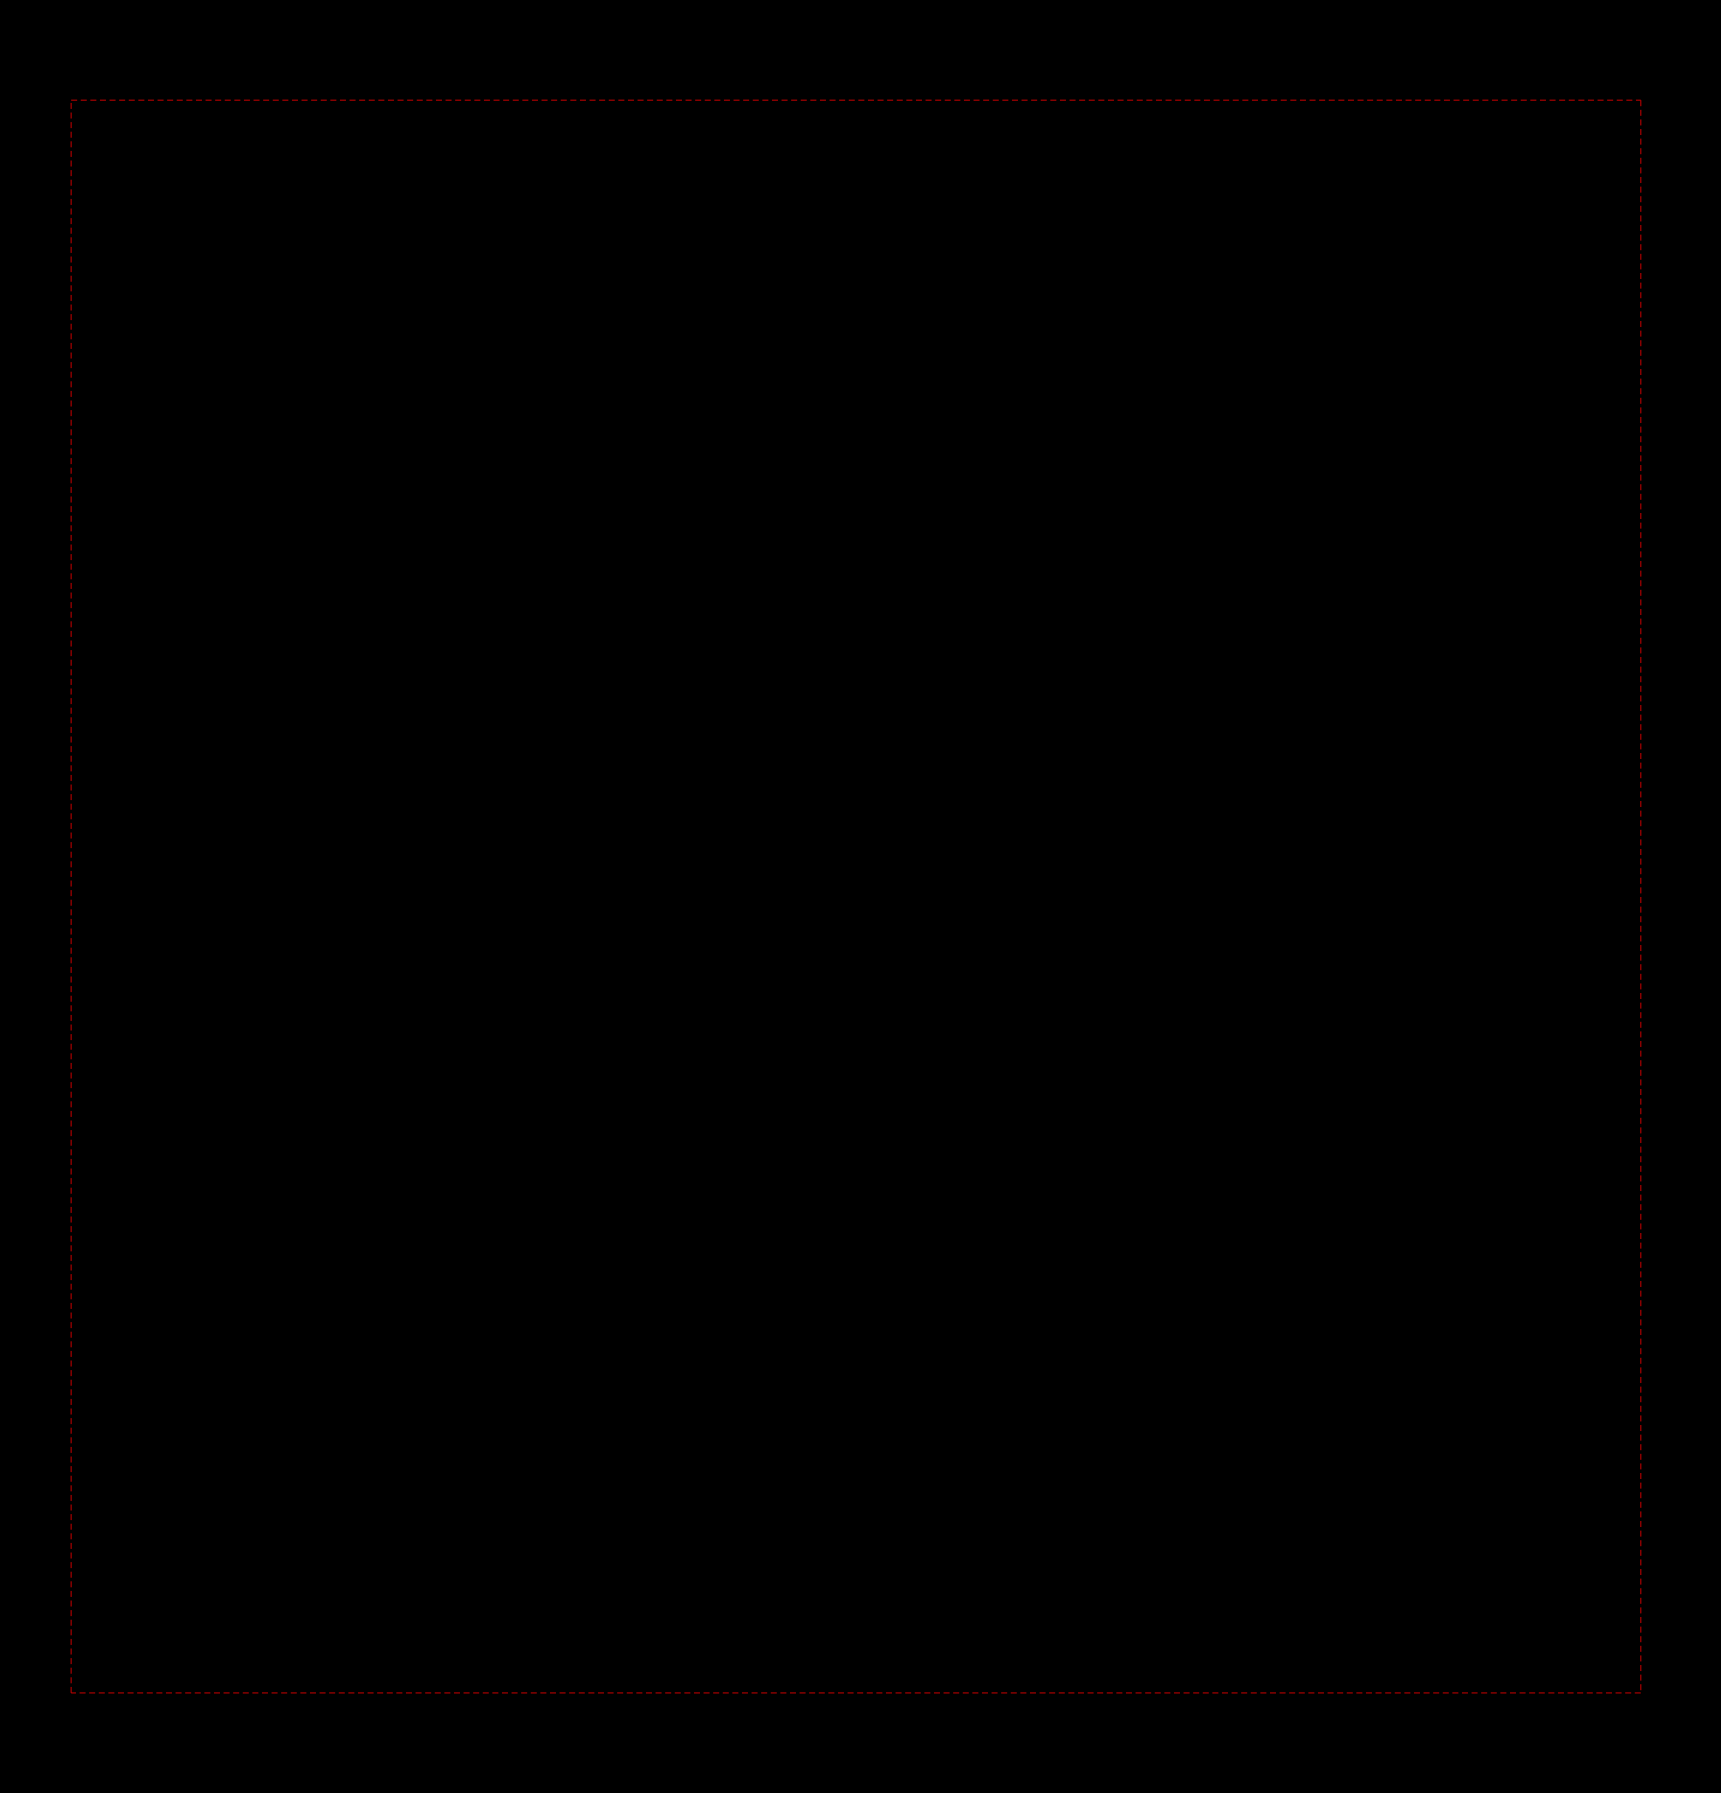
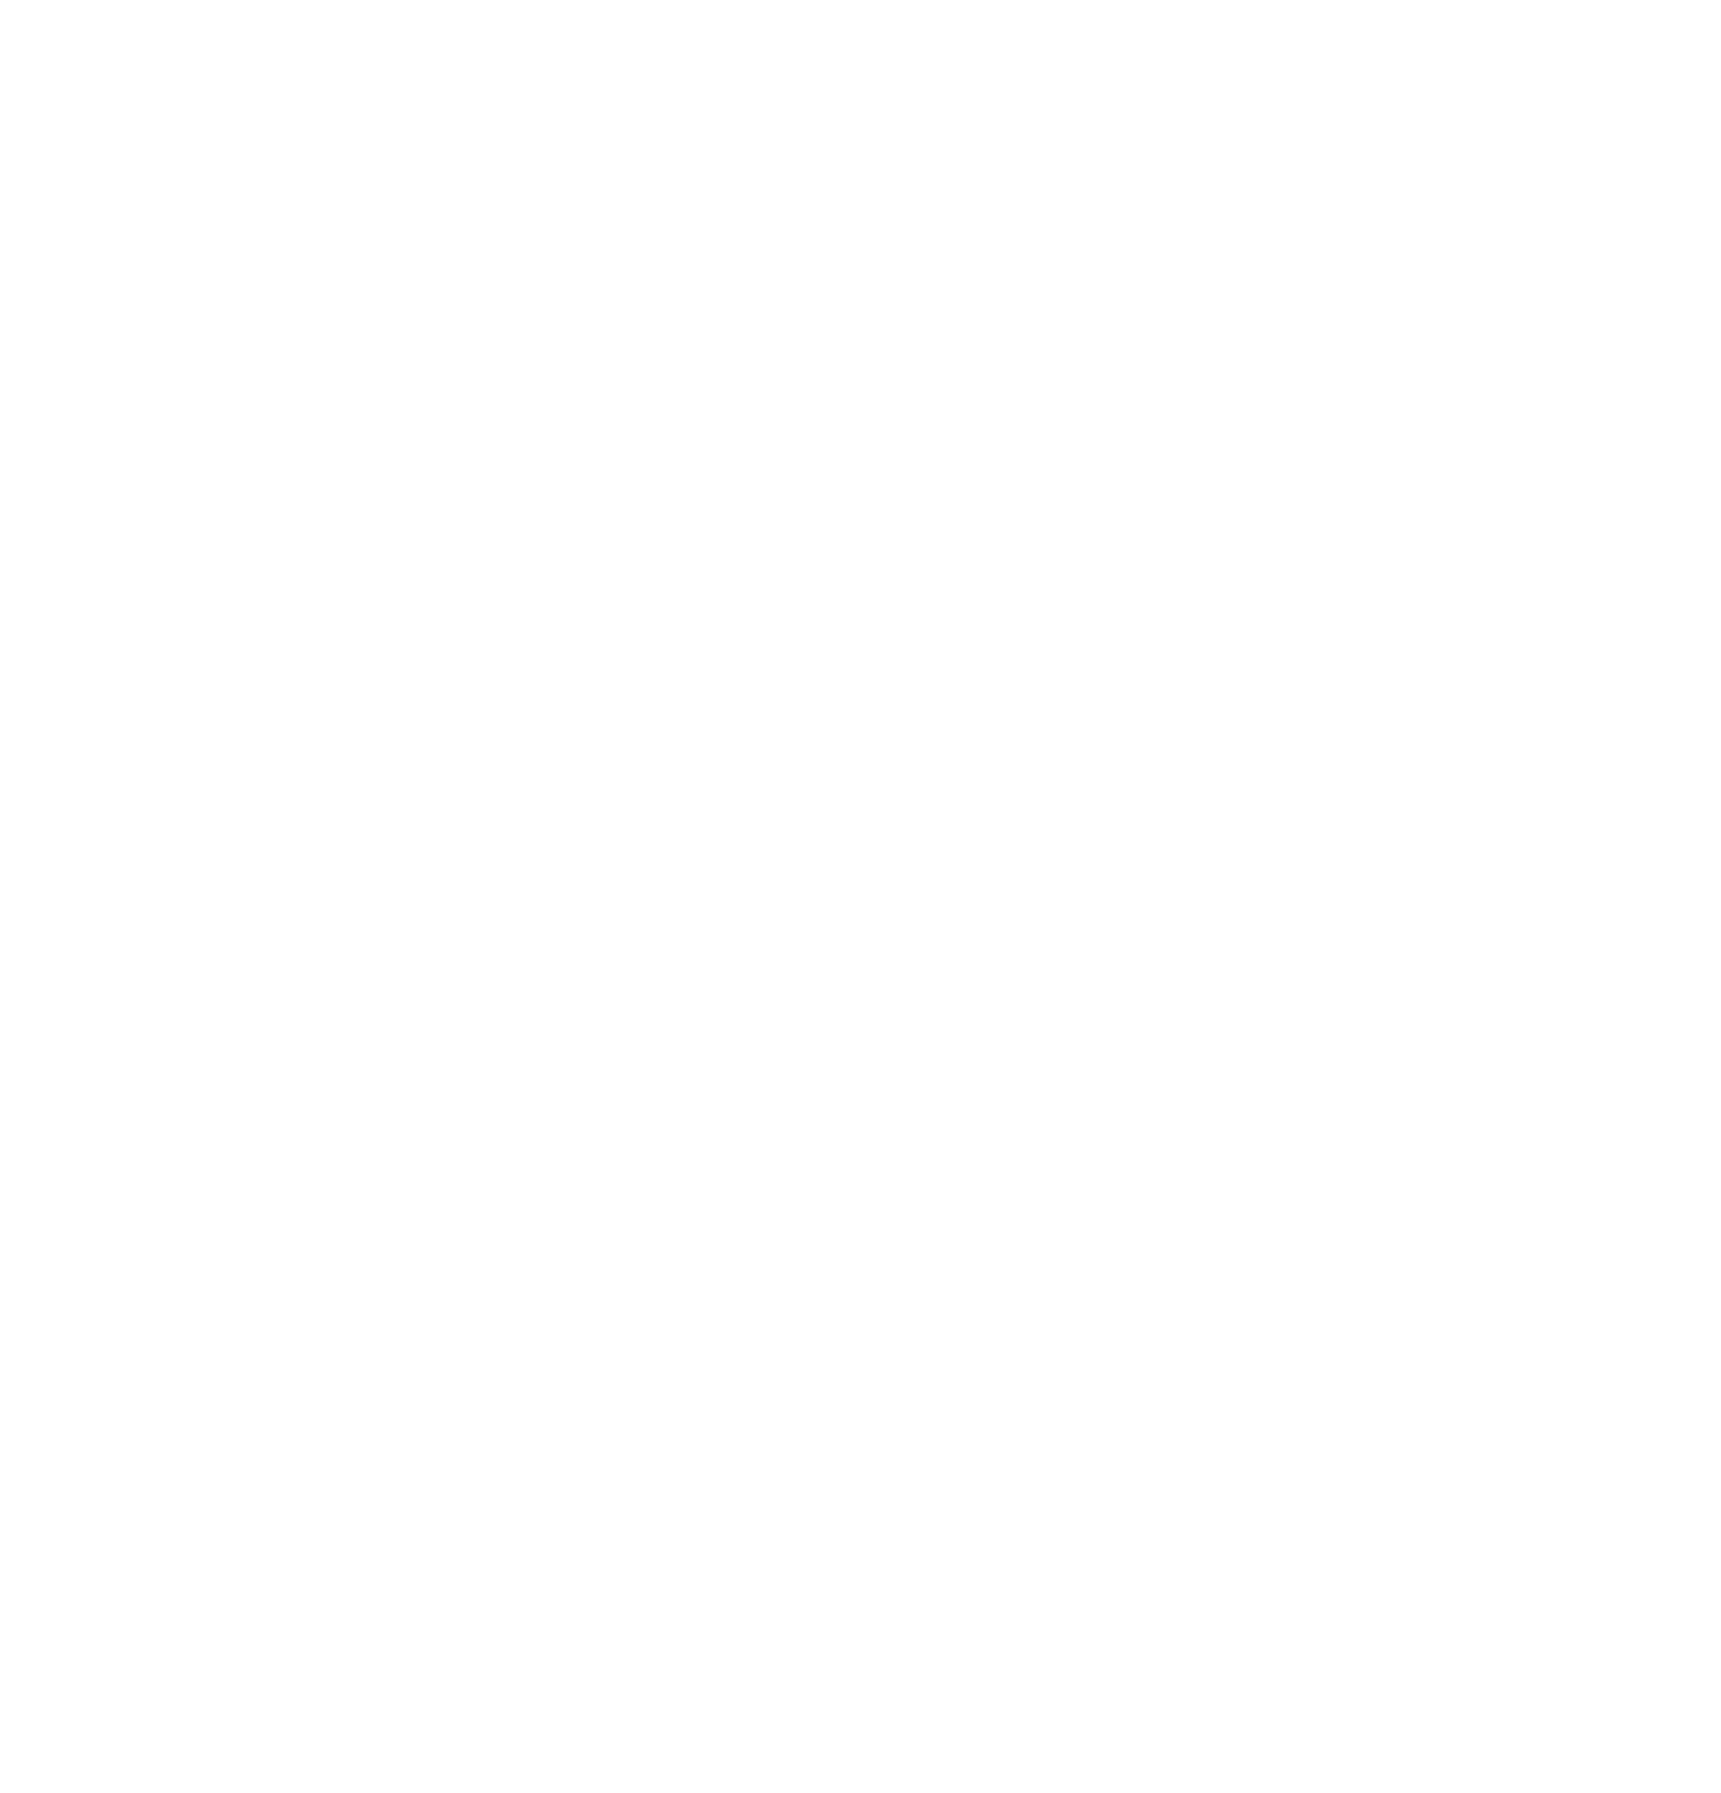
zone outline: (71, 100) (71, 1692) (1640, 1692) (1640, 100) (71, 100) -> none

